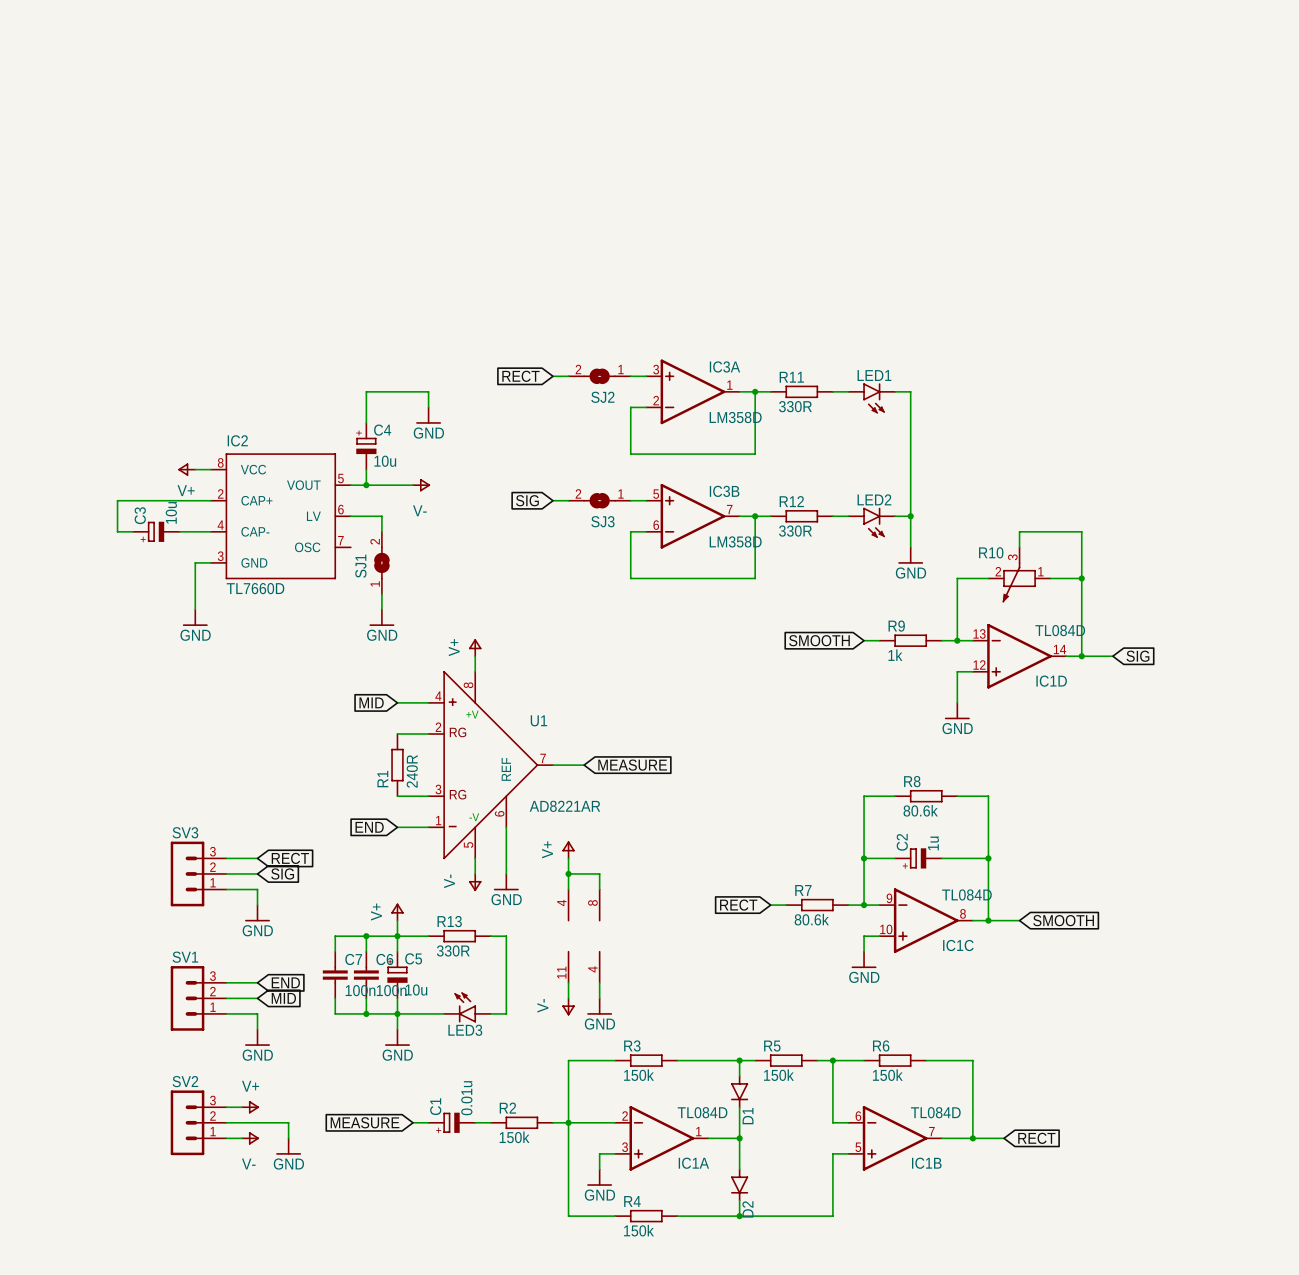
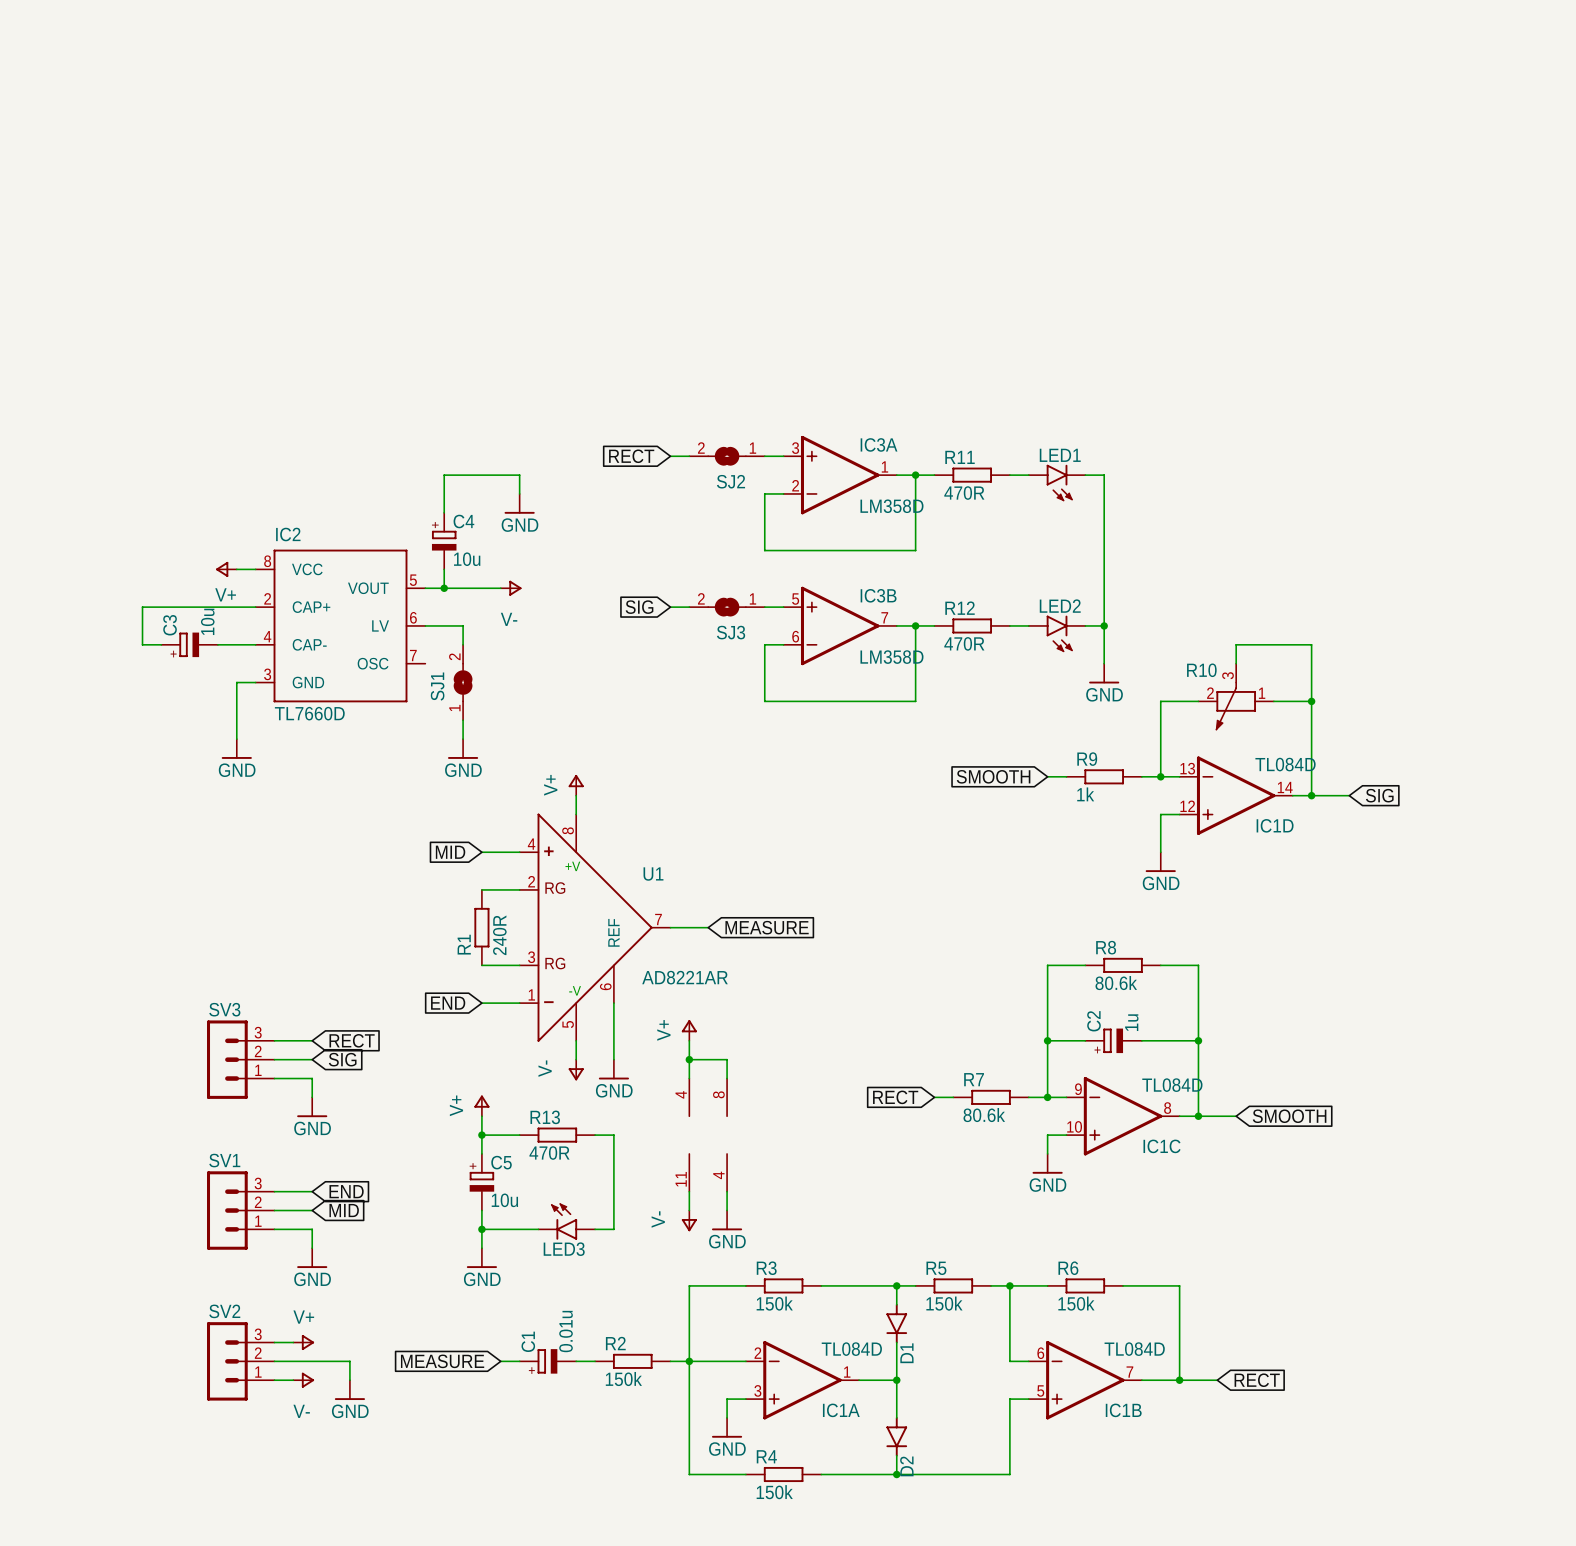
R11 value: 330R (795, 406) -> 470R (964, 493)
R12 value: 330R (795, 531) -> 470R (964, 643)
wire: (366, 936) (366, 951) -> none
junction: (366, 936) -> none
wire: (397, 936) (335, 936) (335, 951) -> none
R13 value: 330R (453, 950) -> 470R (549, 1153)
C7: 100n (335, 975) -> none
C6: 100n (366, 975) -> none
wire: (335, 998) (335, 1013) (397, 1013) -> none
wire: (366, 998) (366, 1013) -> none
junction: (366, 1013) -> none

